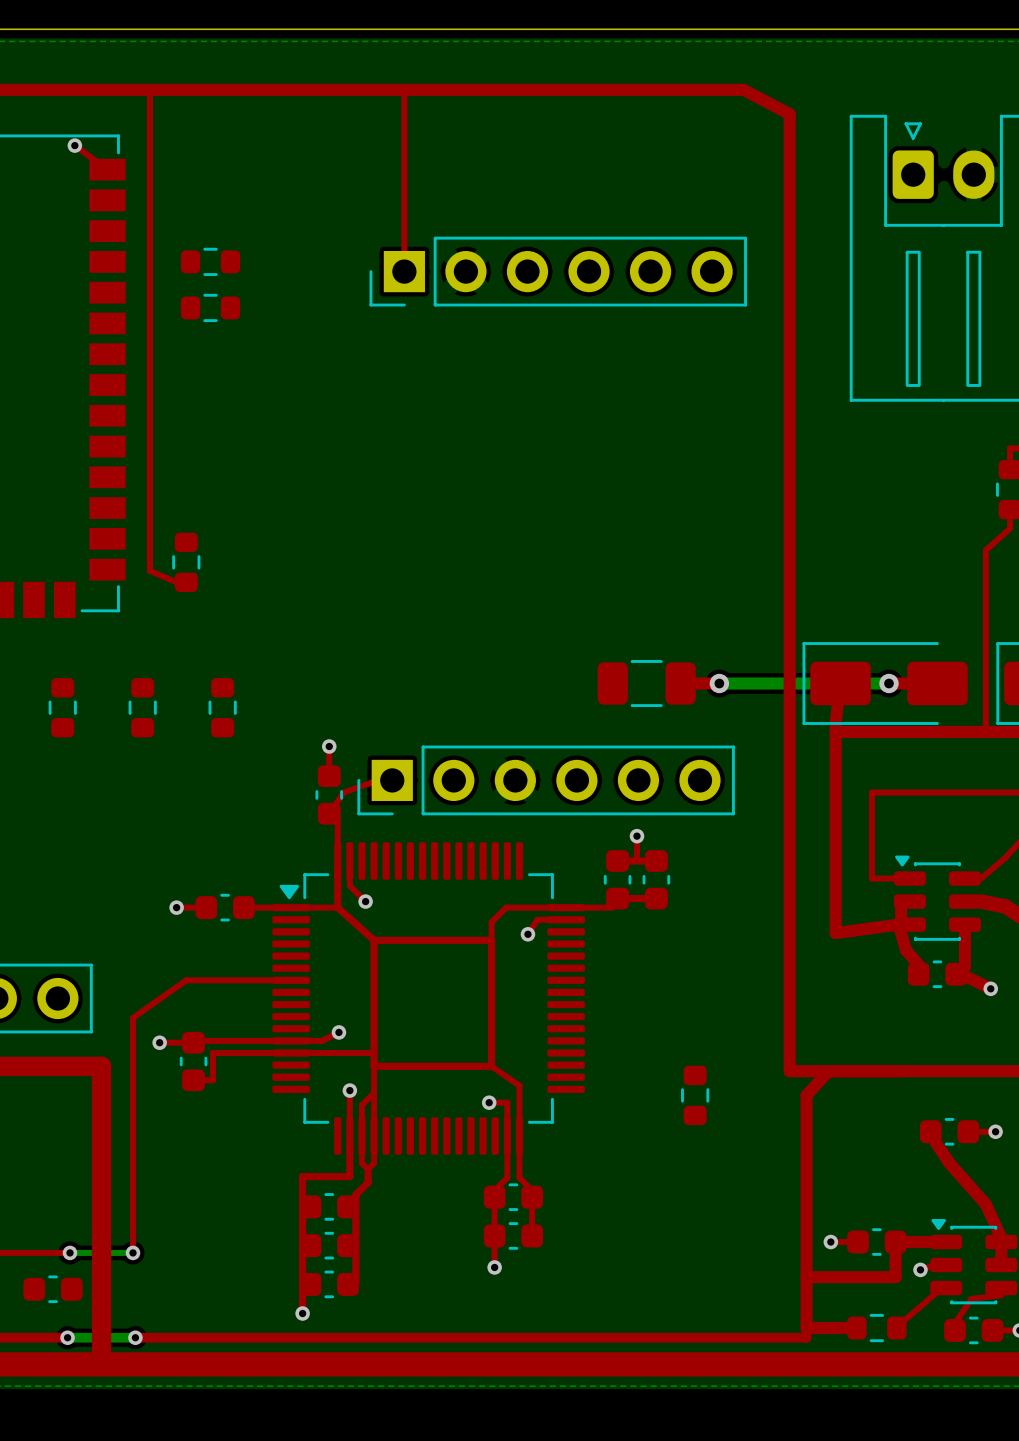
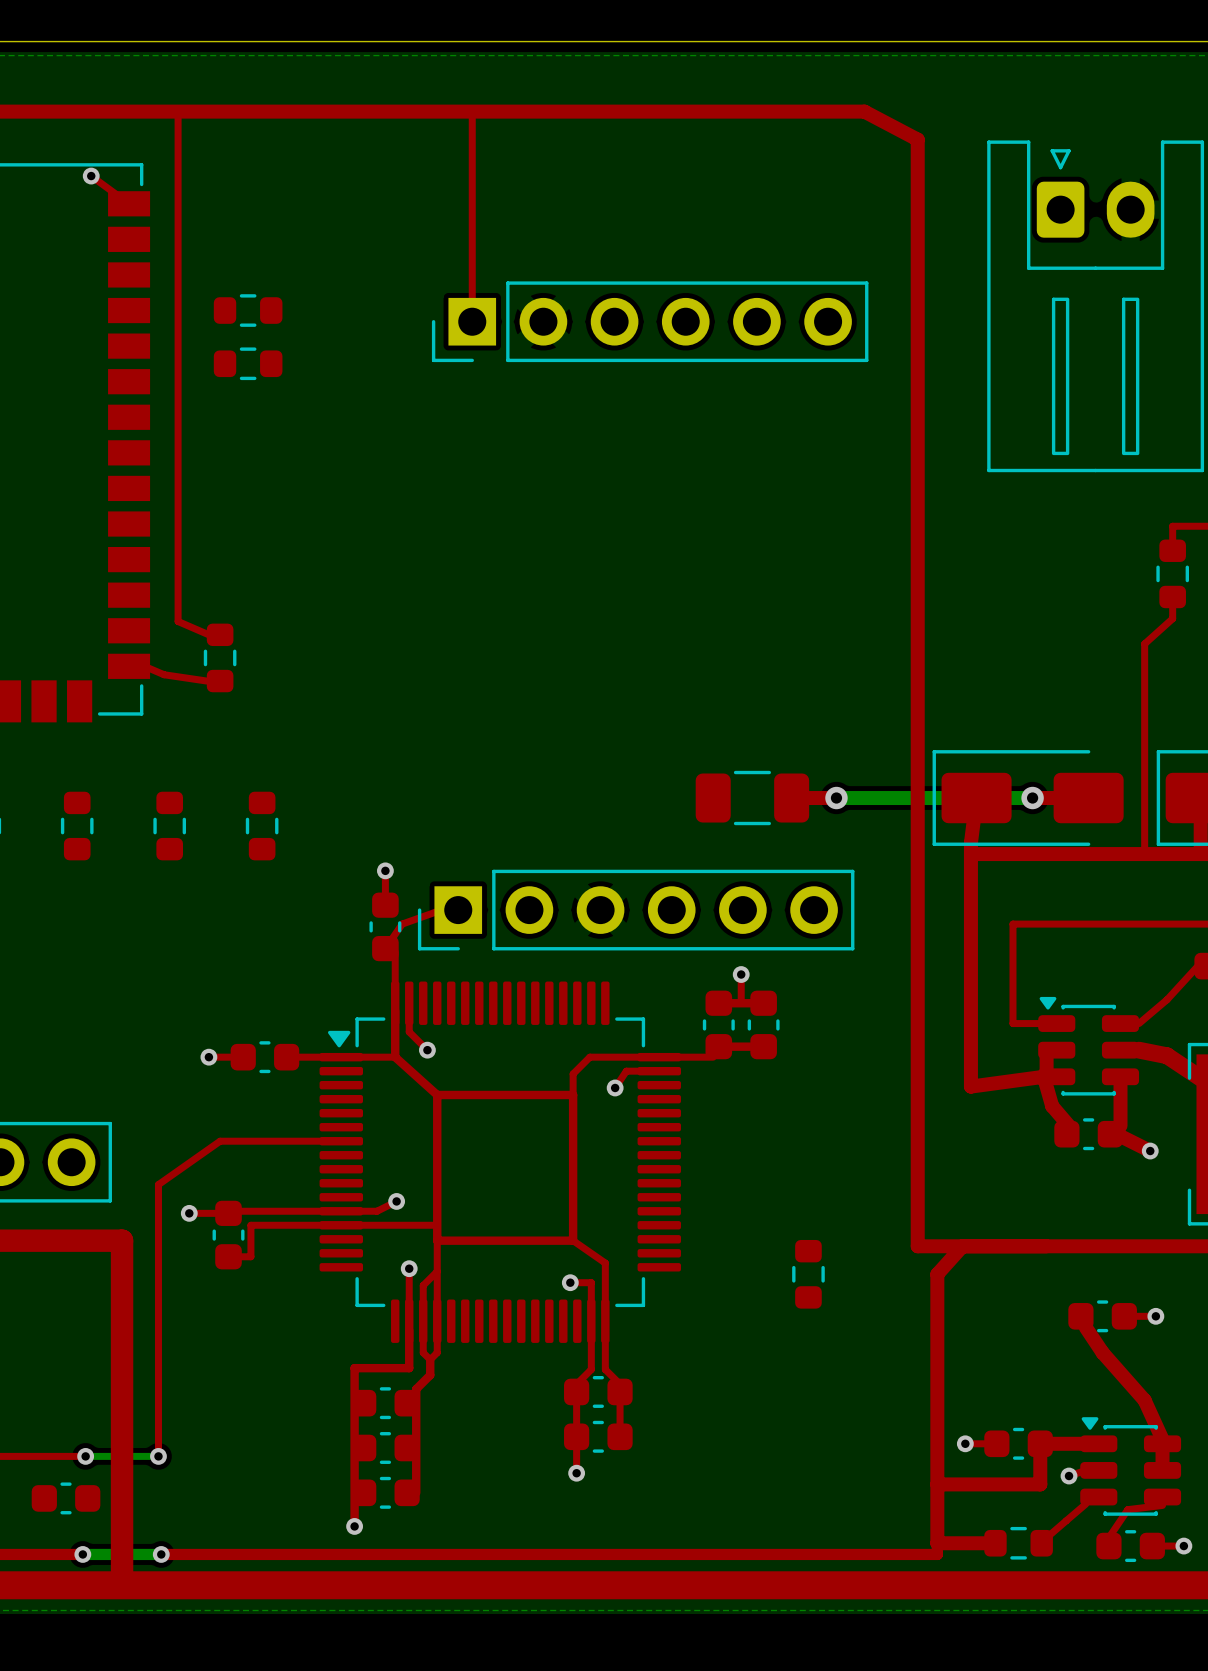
top track: (149, 530) (149, 570) (176, 582) -> (178, 621) (208, 634)
top track: none -> (144, 666) (164, 674) (206, 681)

